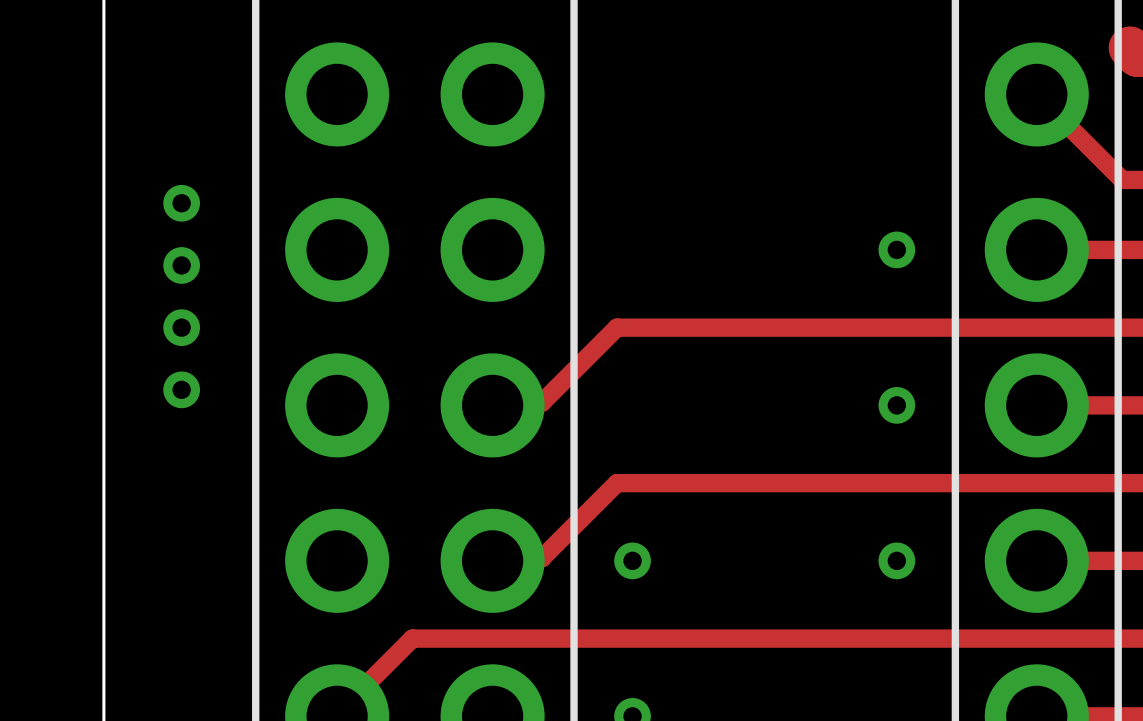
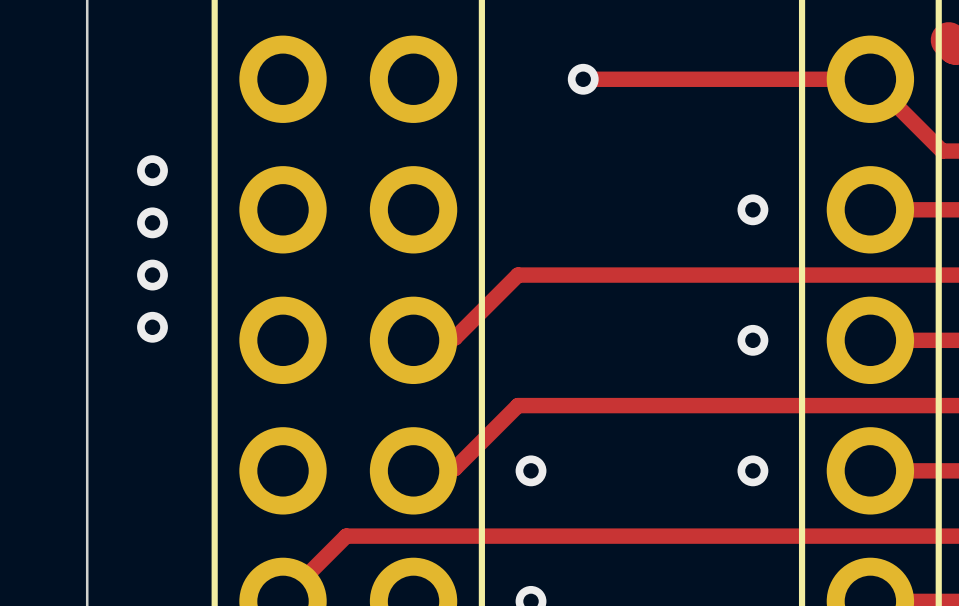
track: none -> (583, 79) (870, 79)
via: none -> (583, 79)

